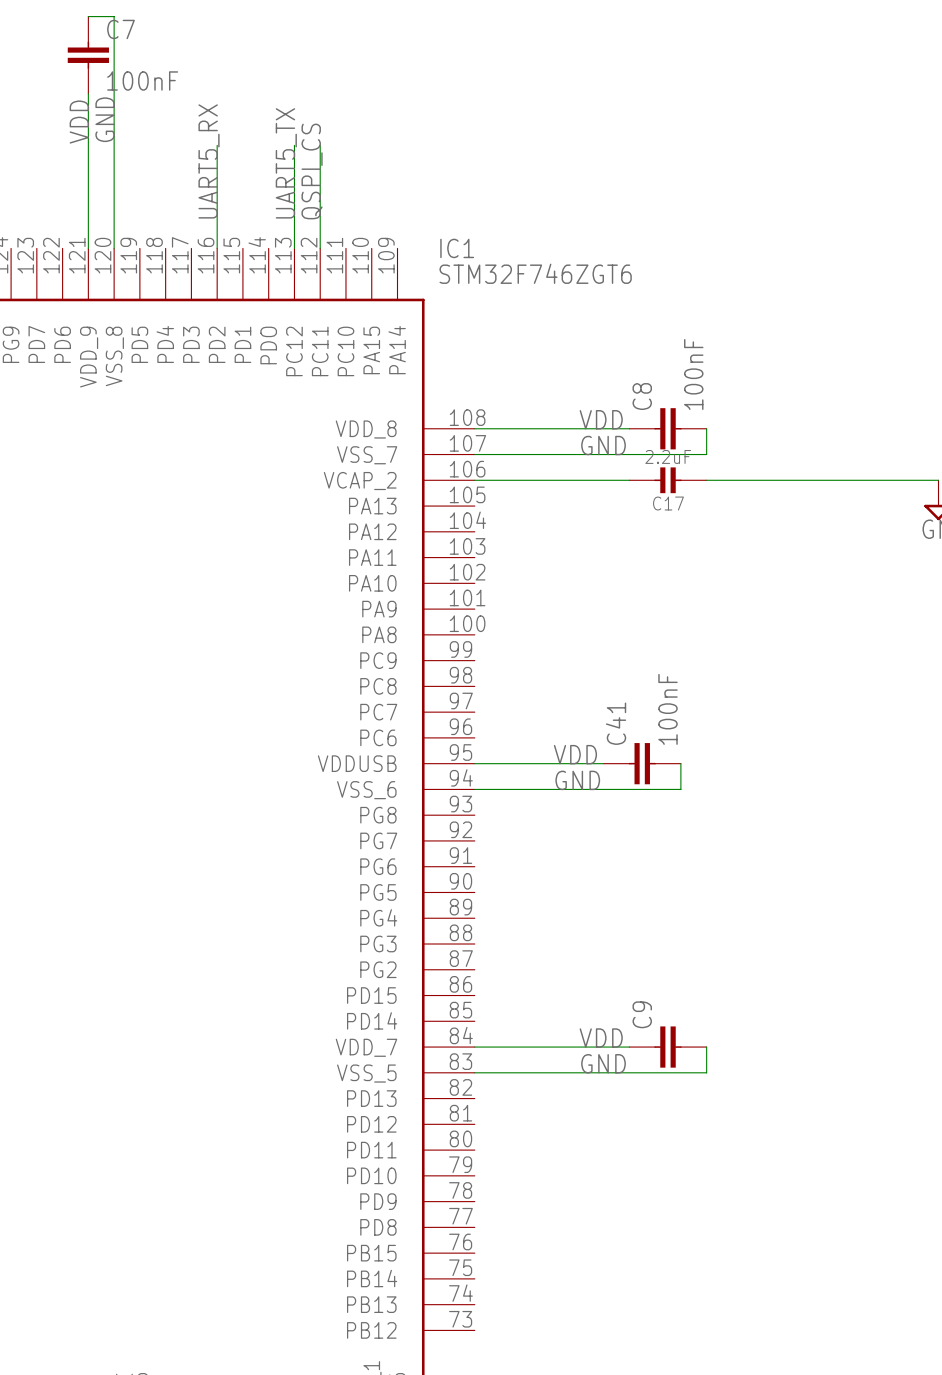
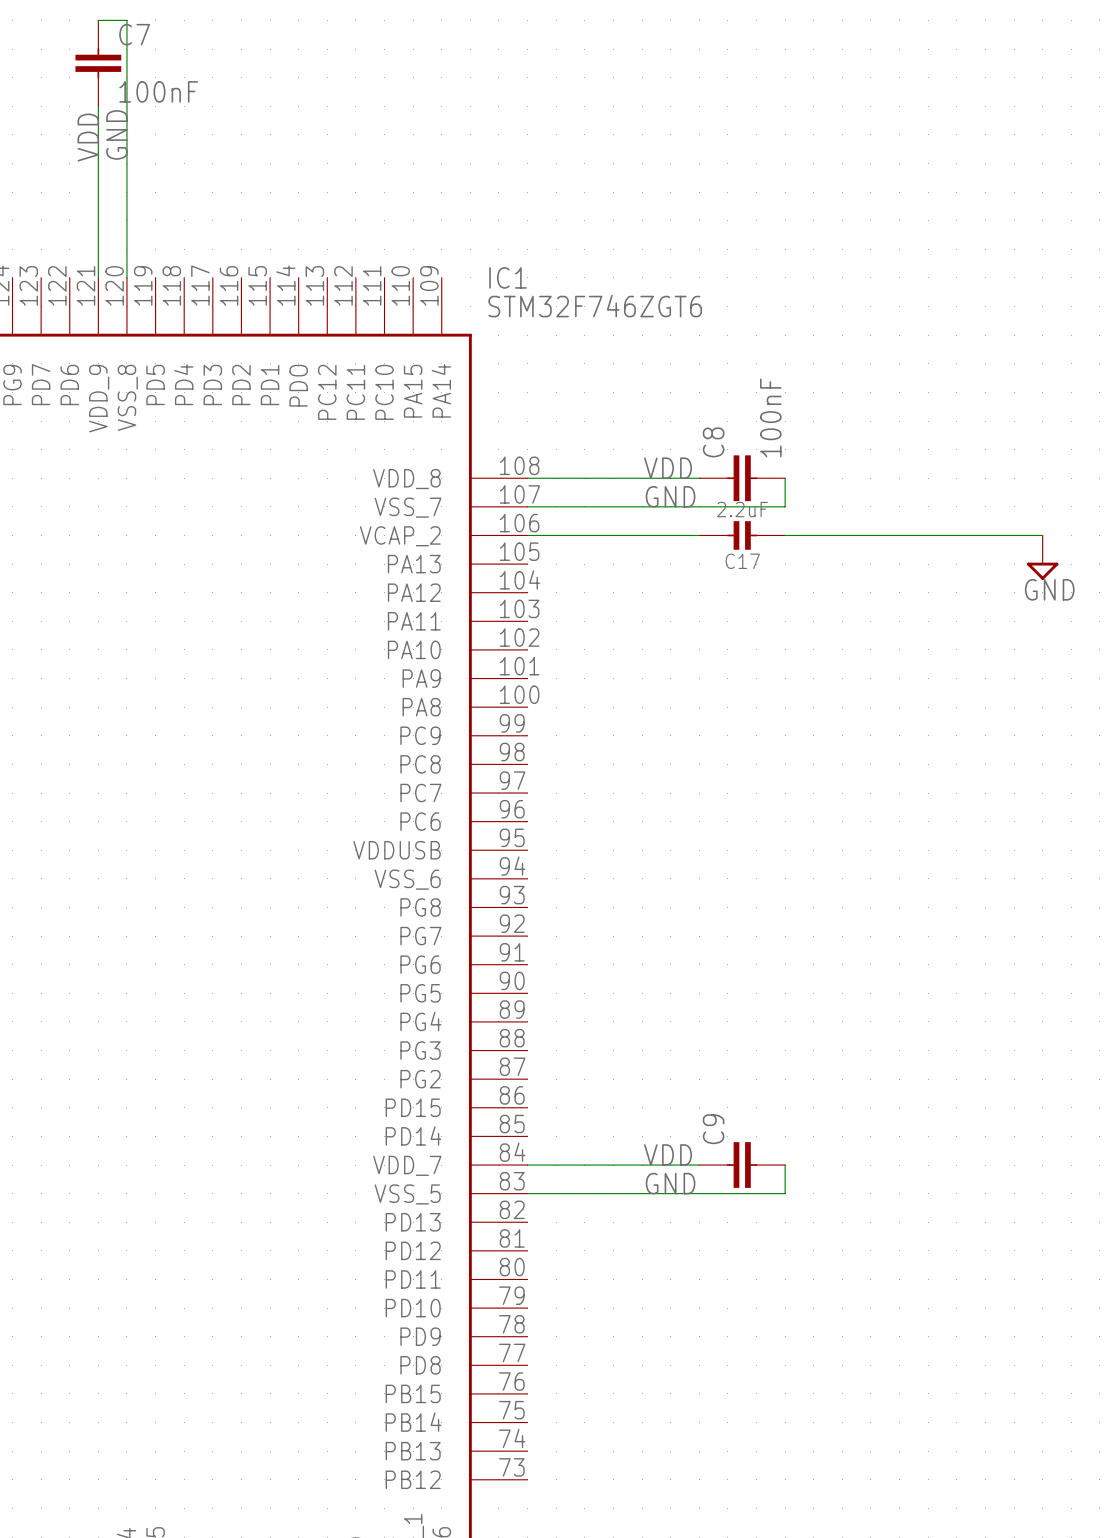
wire: (217, 145) (217, 248) -> none
wire: (294, 145) (294, 248) -> none
wire: (320, 145) (320, 248) -> none
label: UART5_RX (209, 161) -> none
label: UART5_TX (286, 163) -> none
label: QSPI_CS (312, 171) -> none
label: VDD (575, 754) -> none
wire: (474, 763) (603, 763) -> none
C41: 100nF (642, 763) -> none
wire: (680, 763) (680, 789) (474, 789) -> none
label: GND (577, 780) -> none

